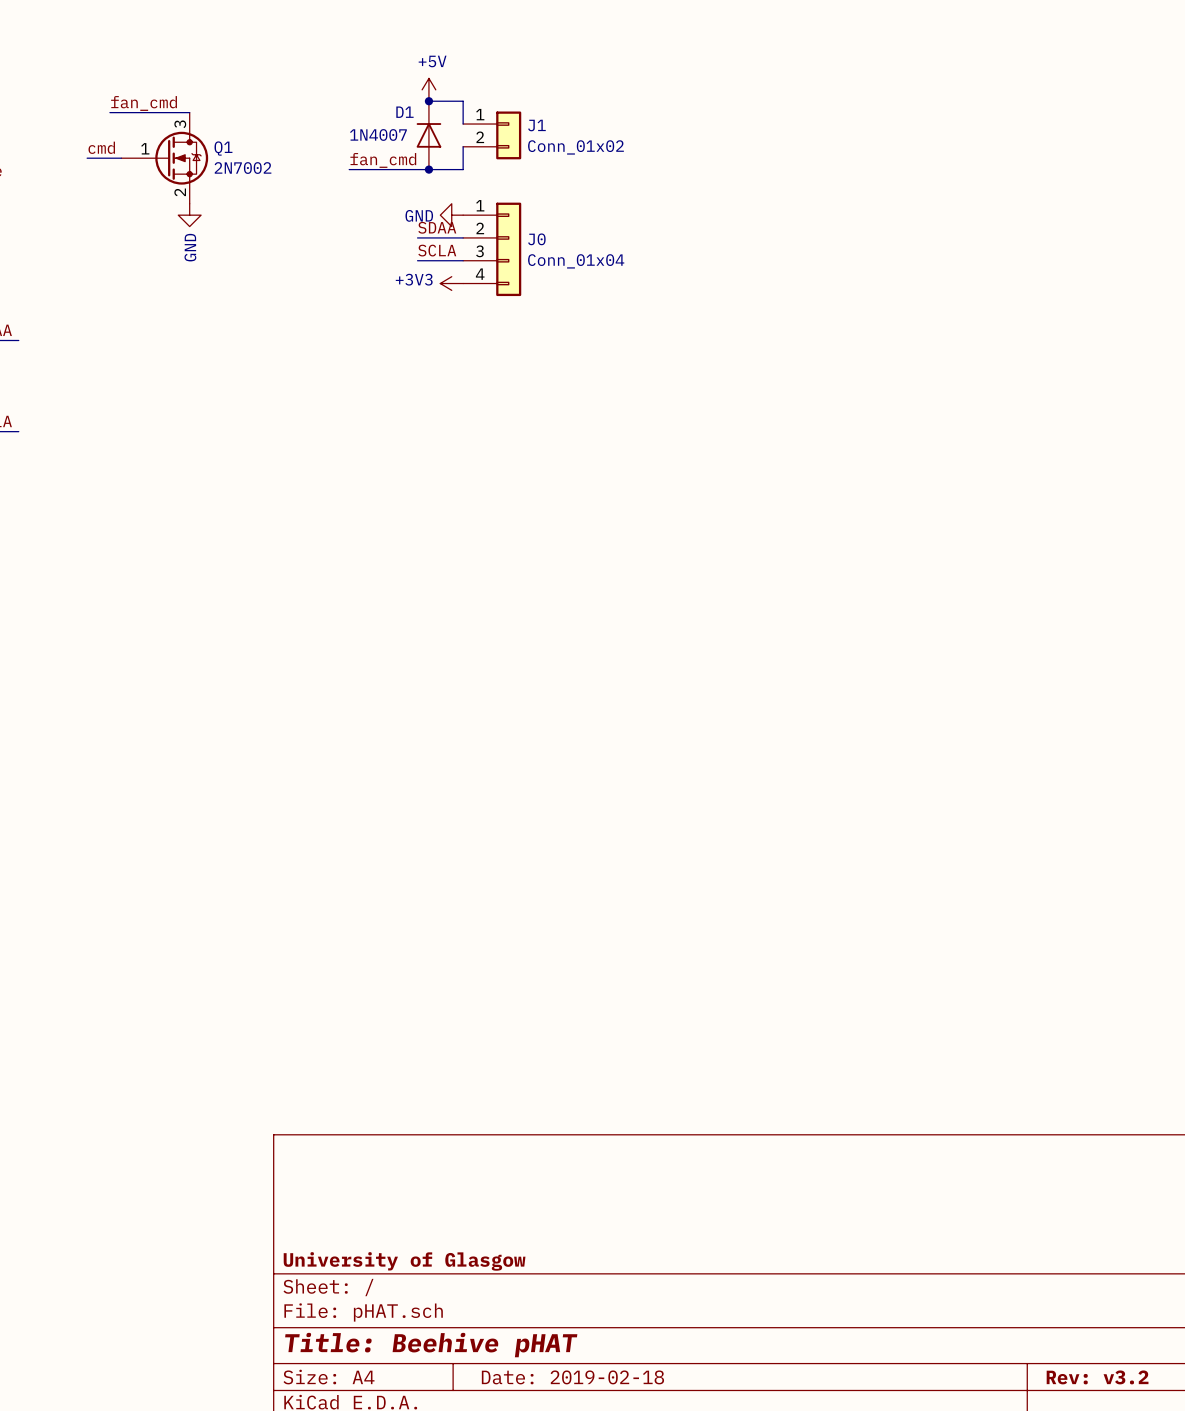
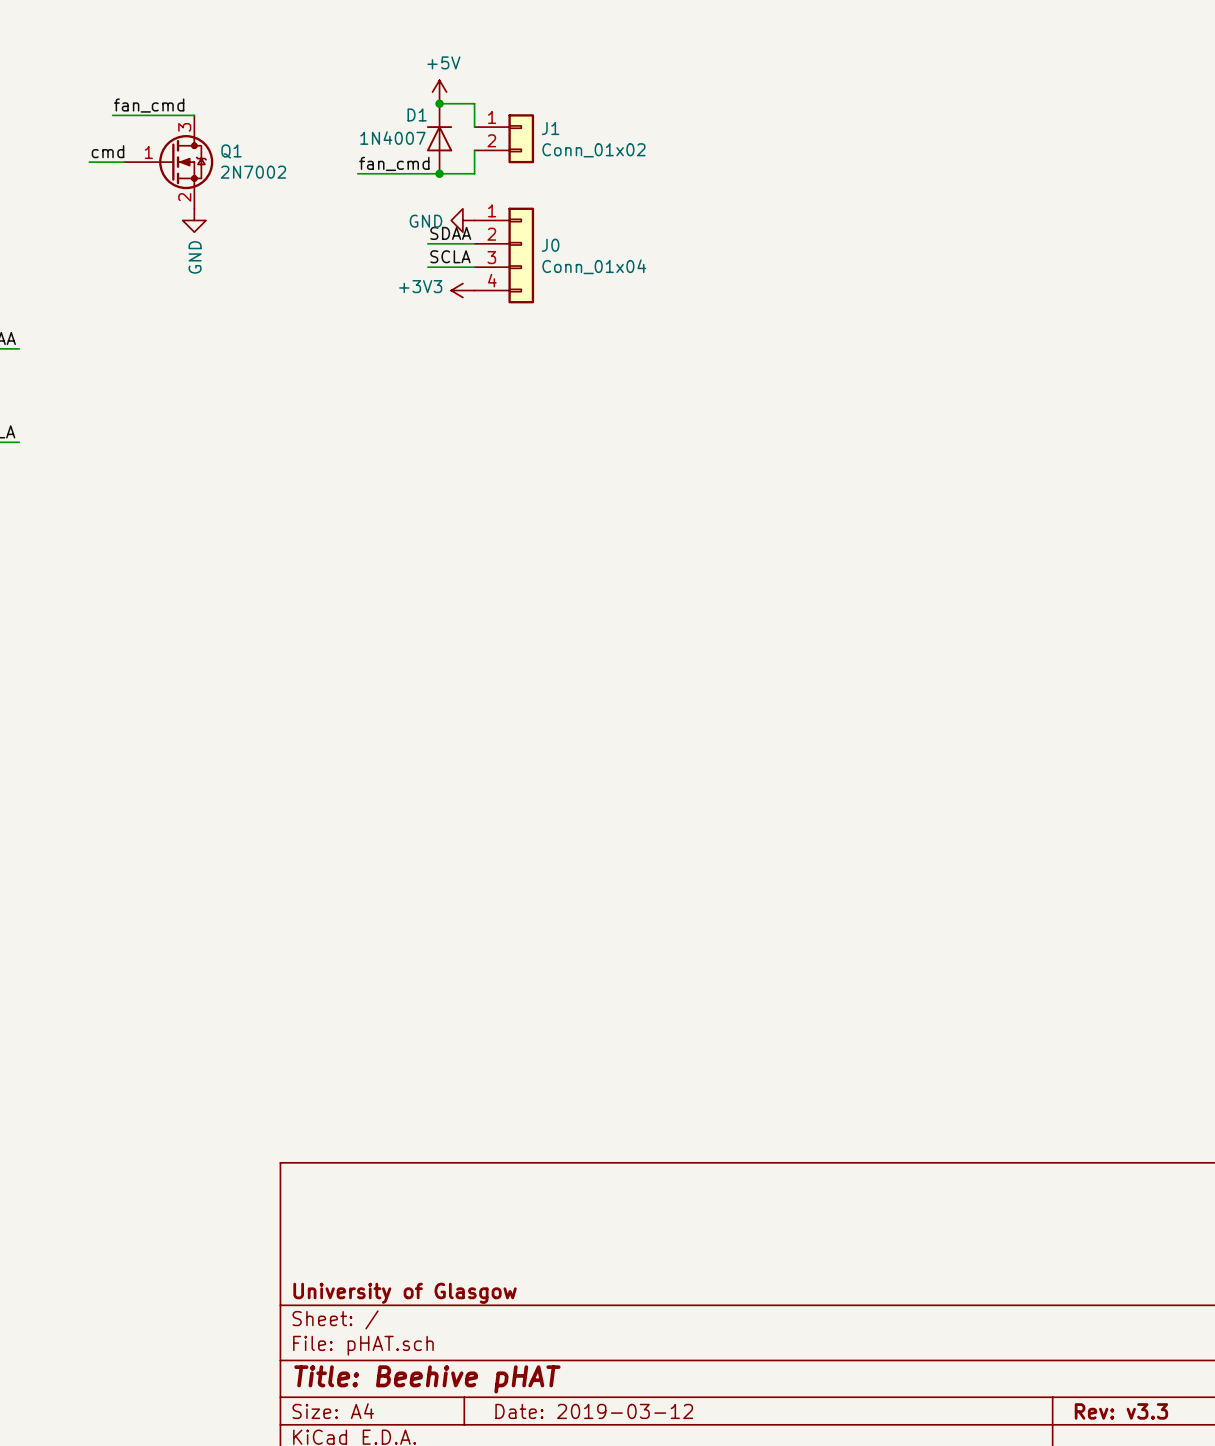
title block: Date: 2019-02-18 (572, 1377) -> Date: 2019-03-12 (594, 1411)
title block: Rev: v3.2 (1097, 1377) -> Rev: v3.3 (1121, 1411)

